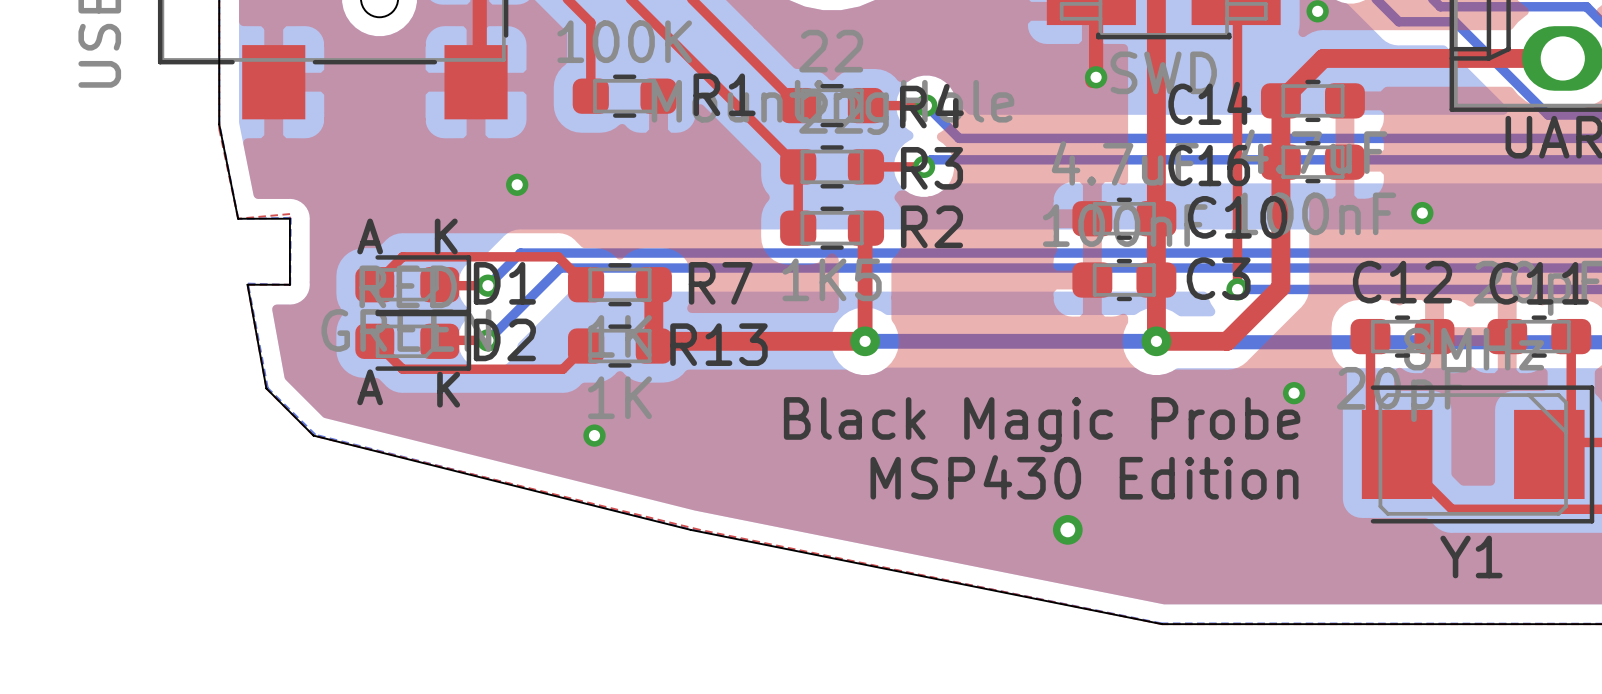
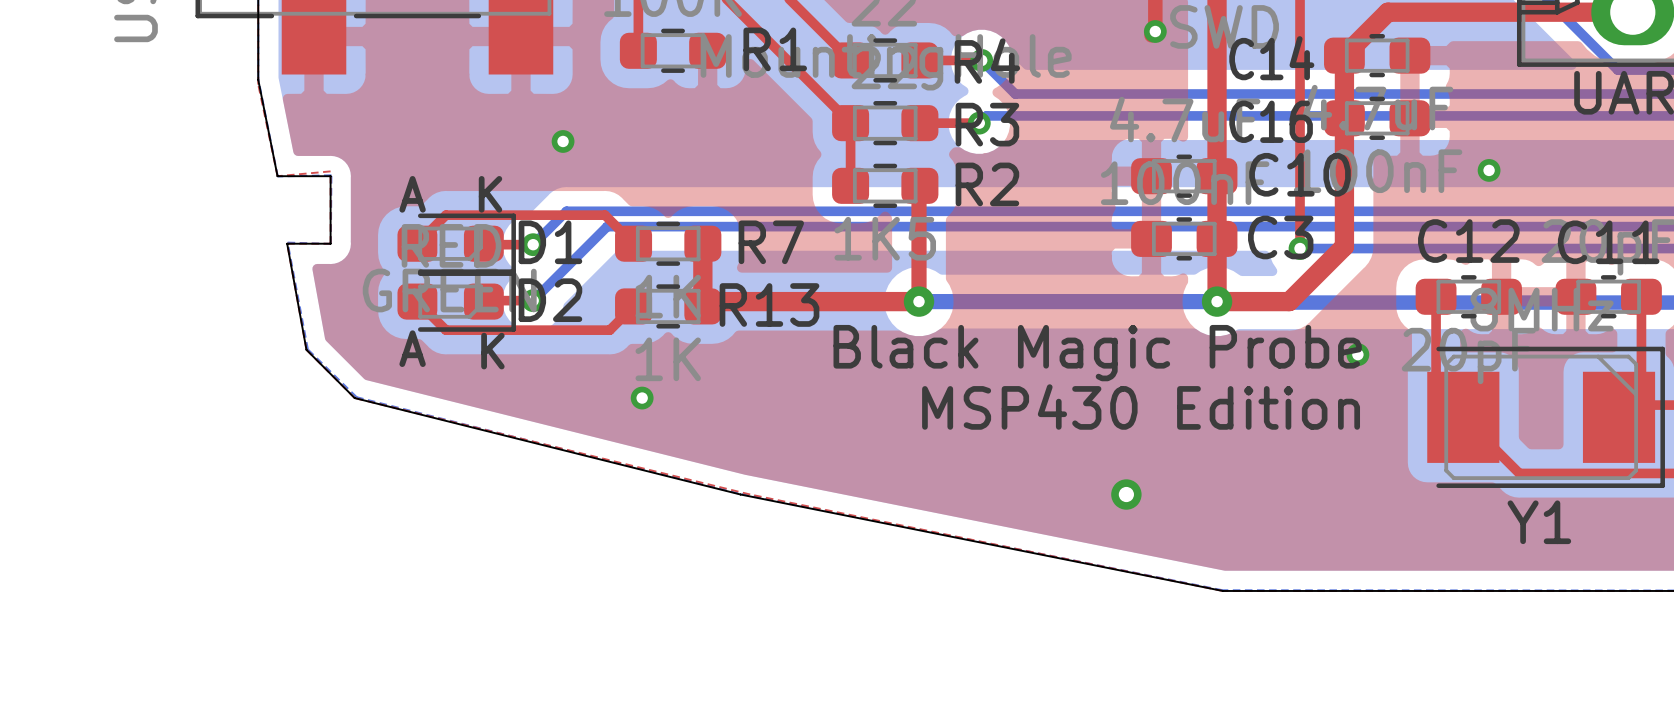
text position: Black Magic Probe (1042, 424) -> Black Magic Probe (1097, 353)
text position: MSP430 Edition (1084, 477) -> MSP430 Edition (1141, 407)

